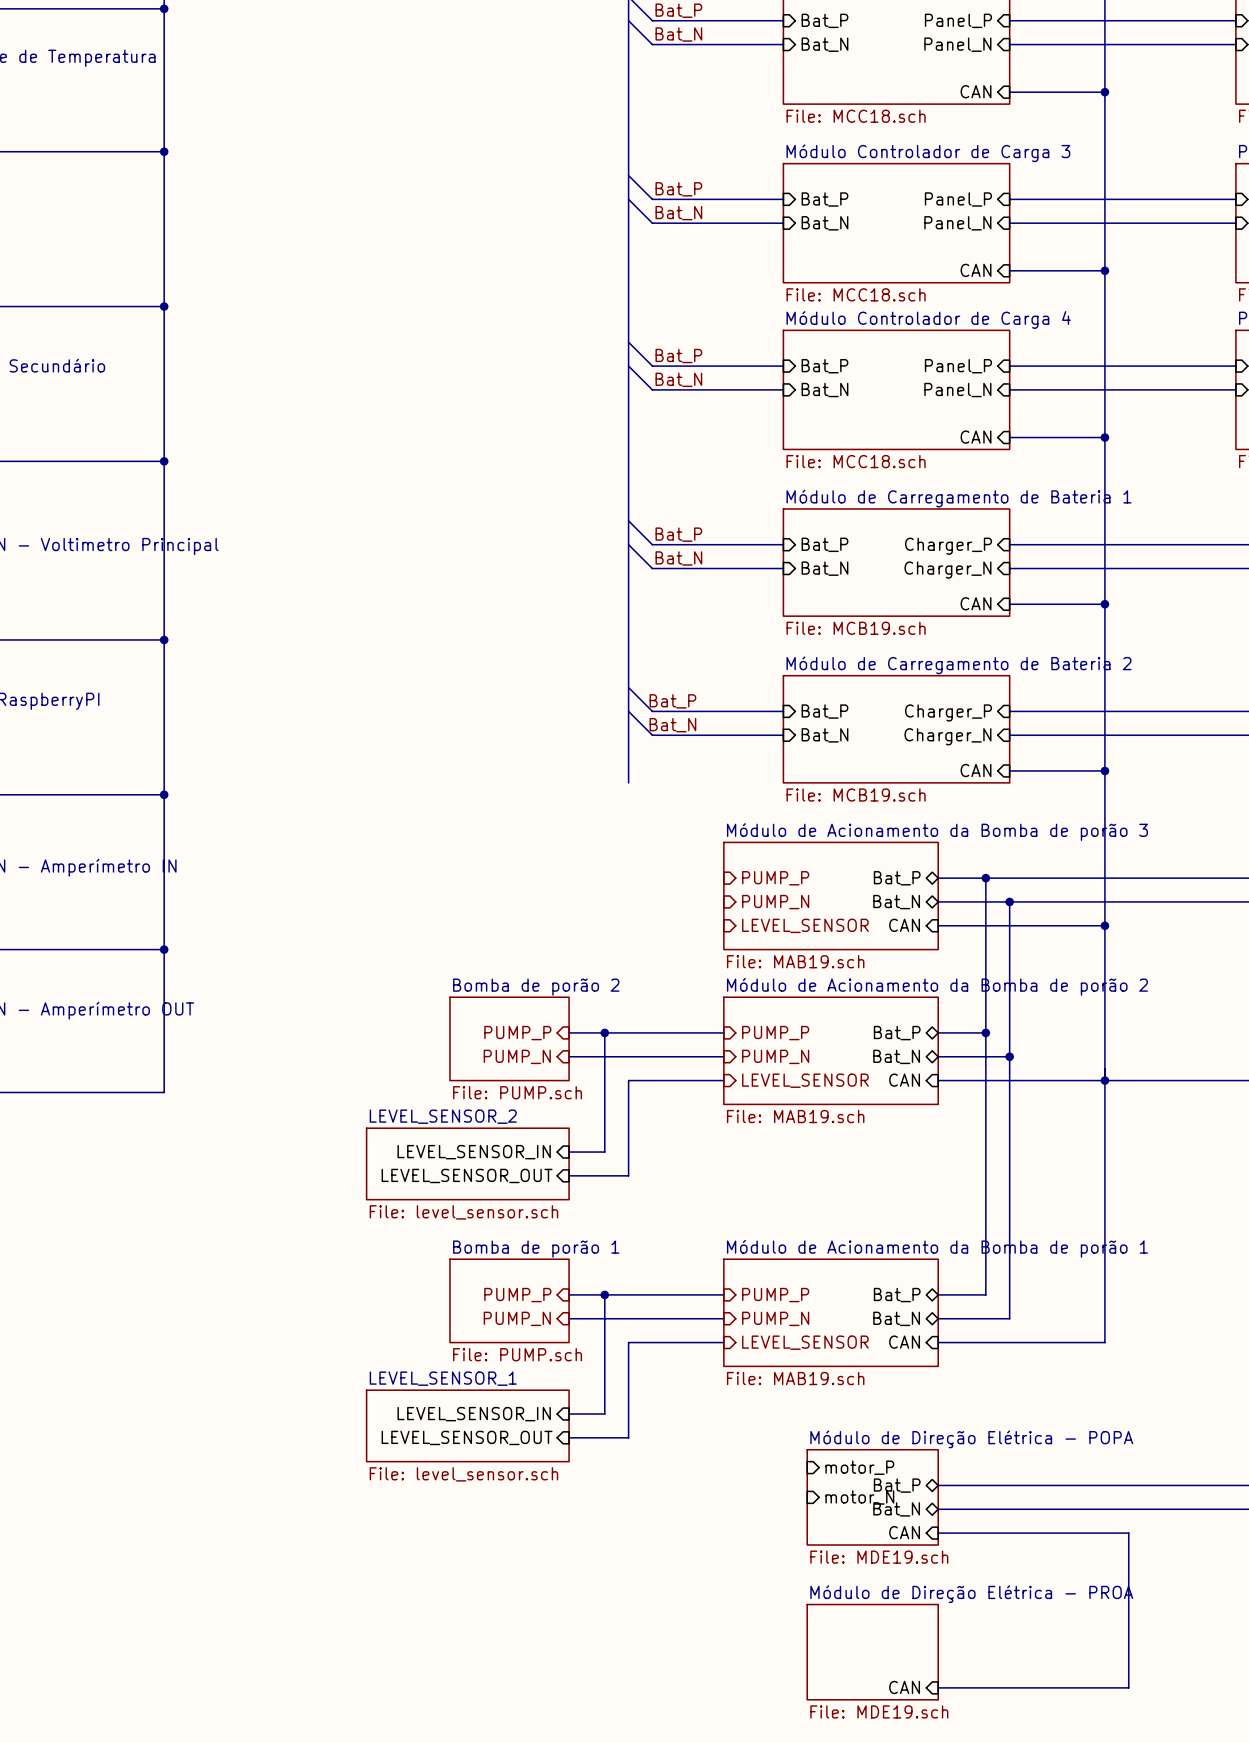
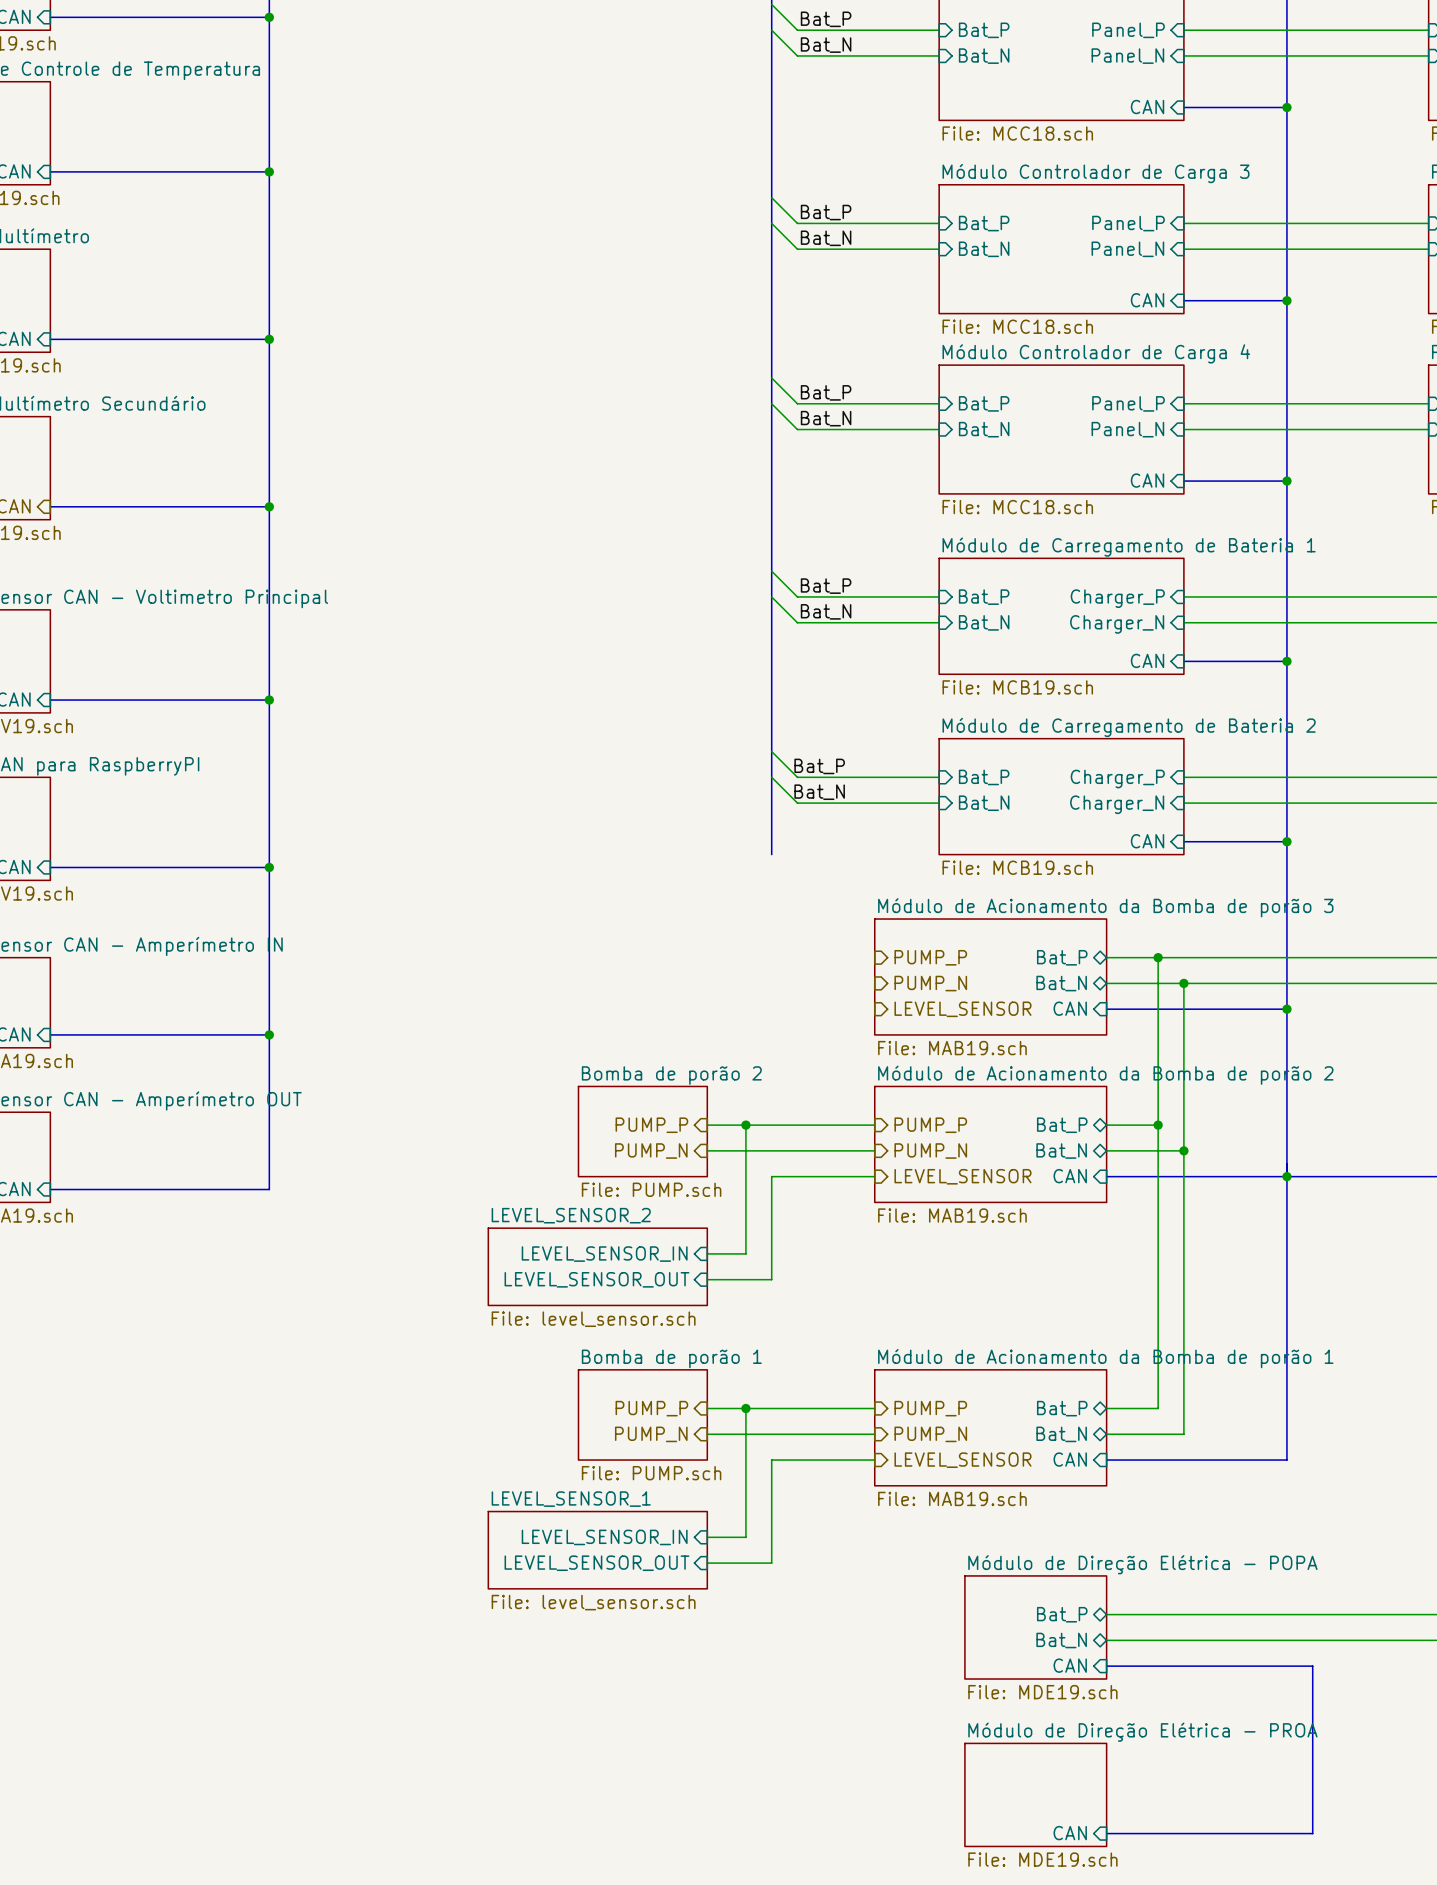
sheet pin: motor_P (859, 1467) -> none
sheet pin: motor_N (859, 1497) -> none

